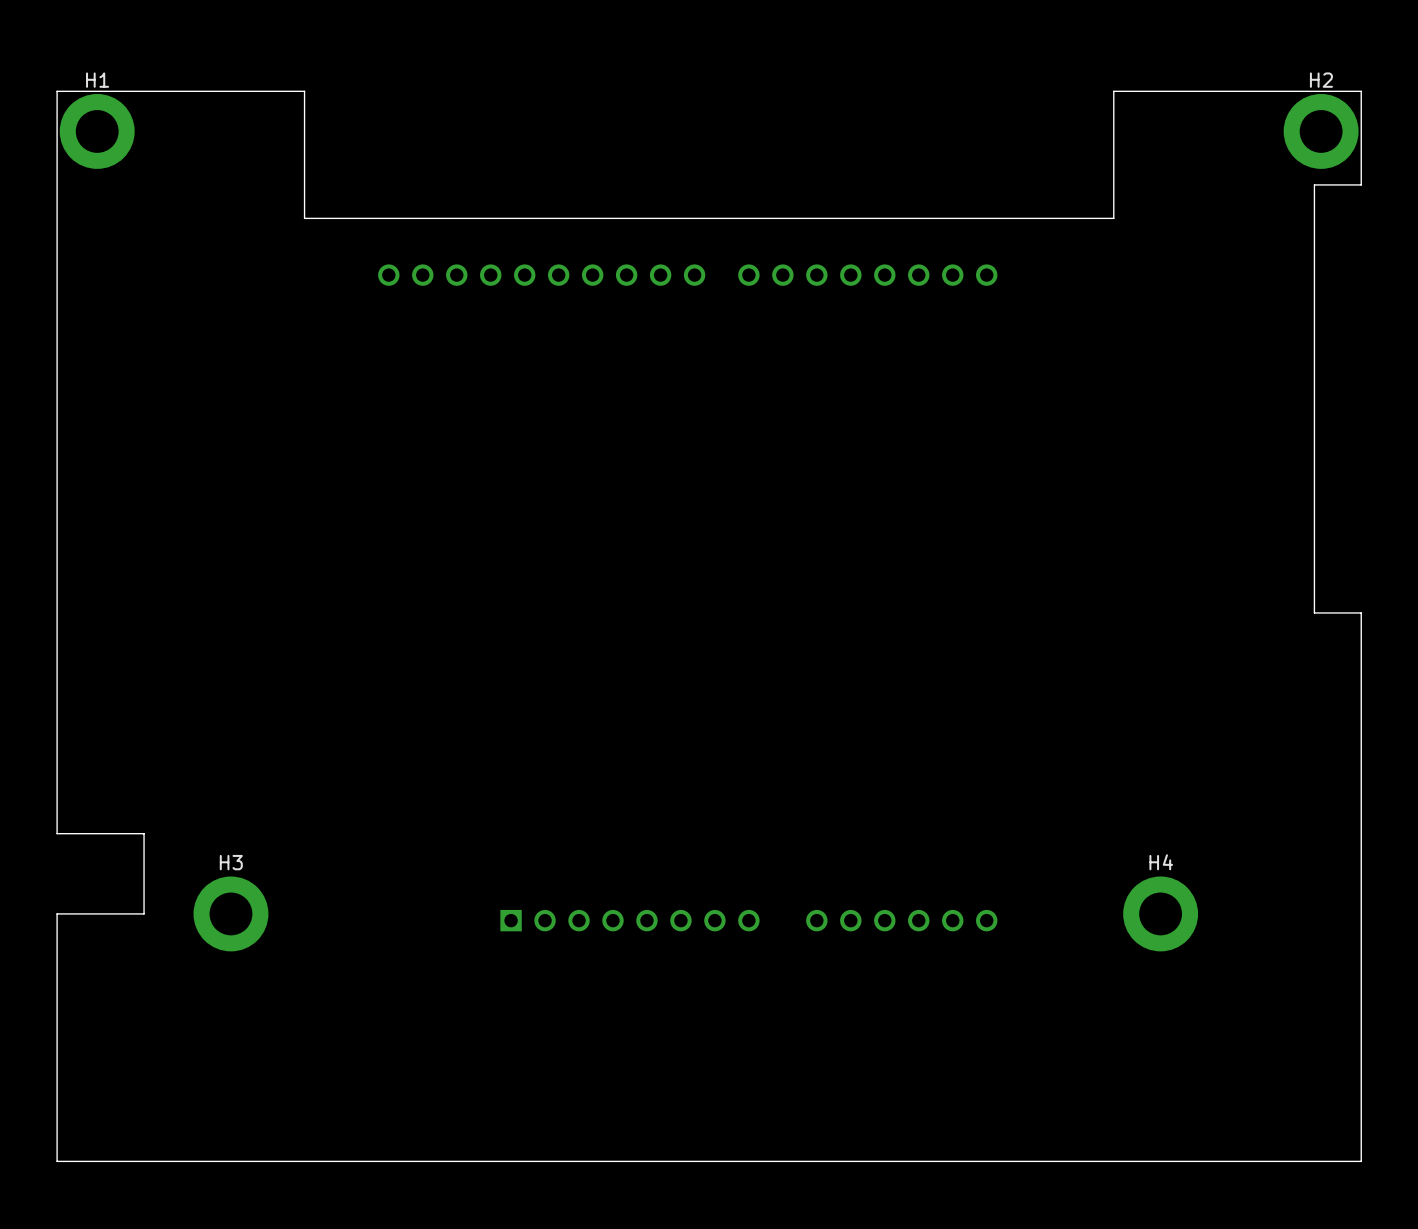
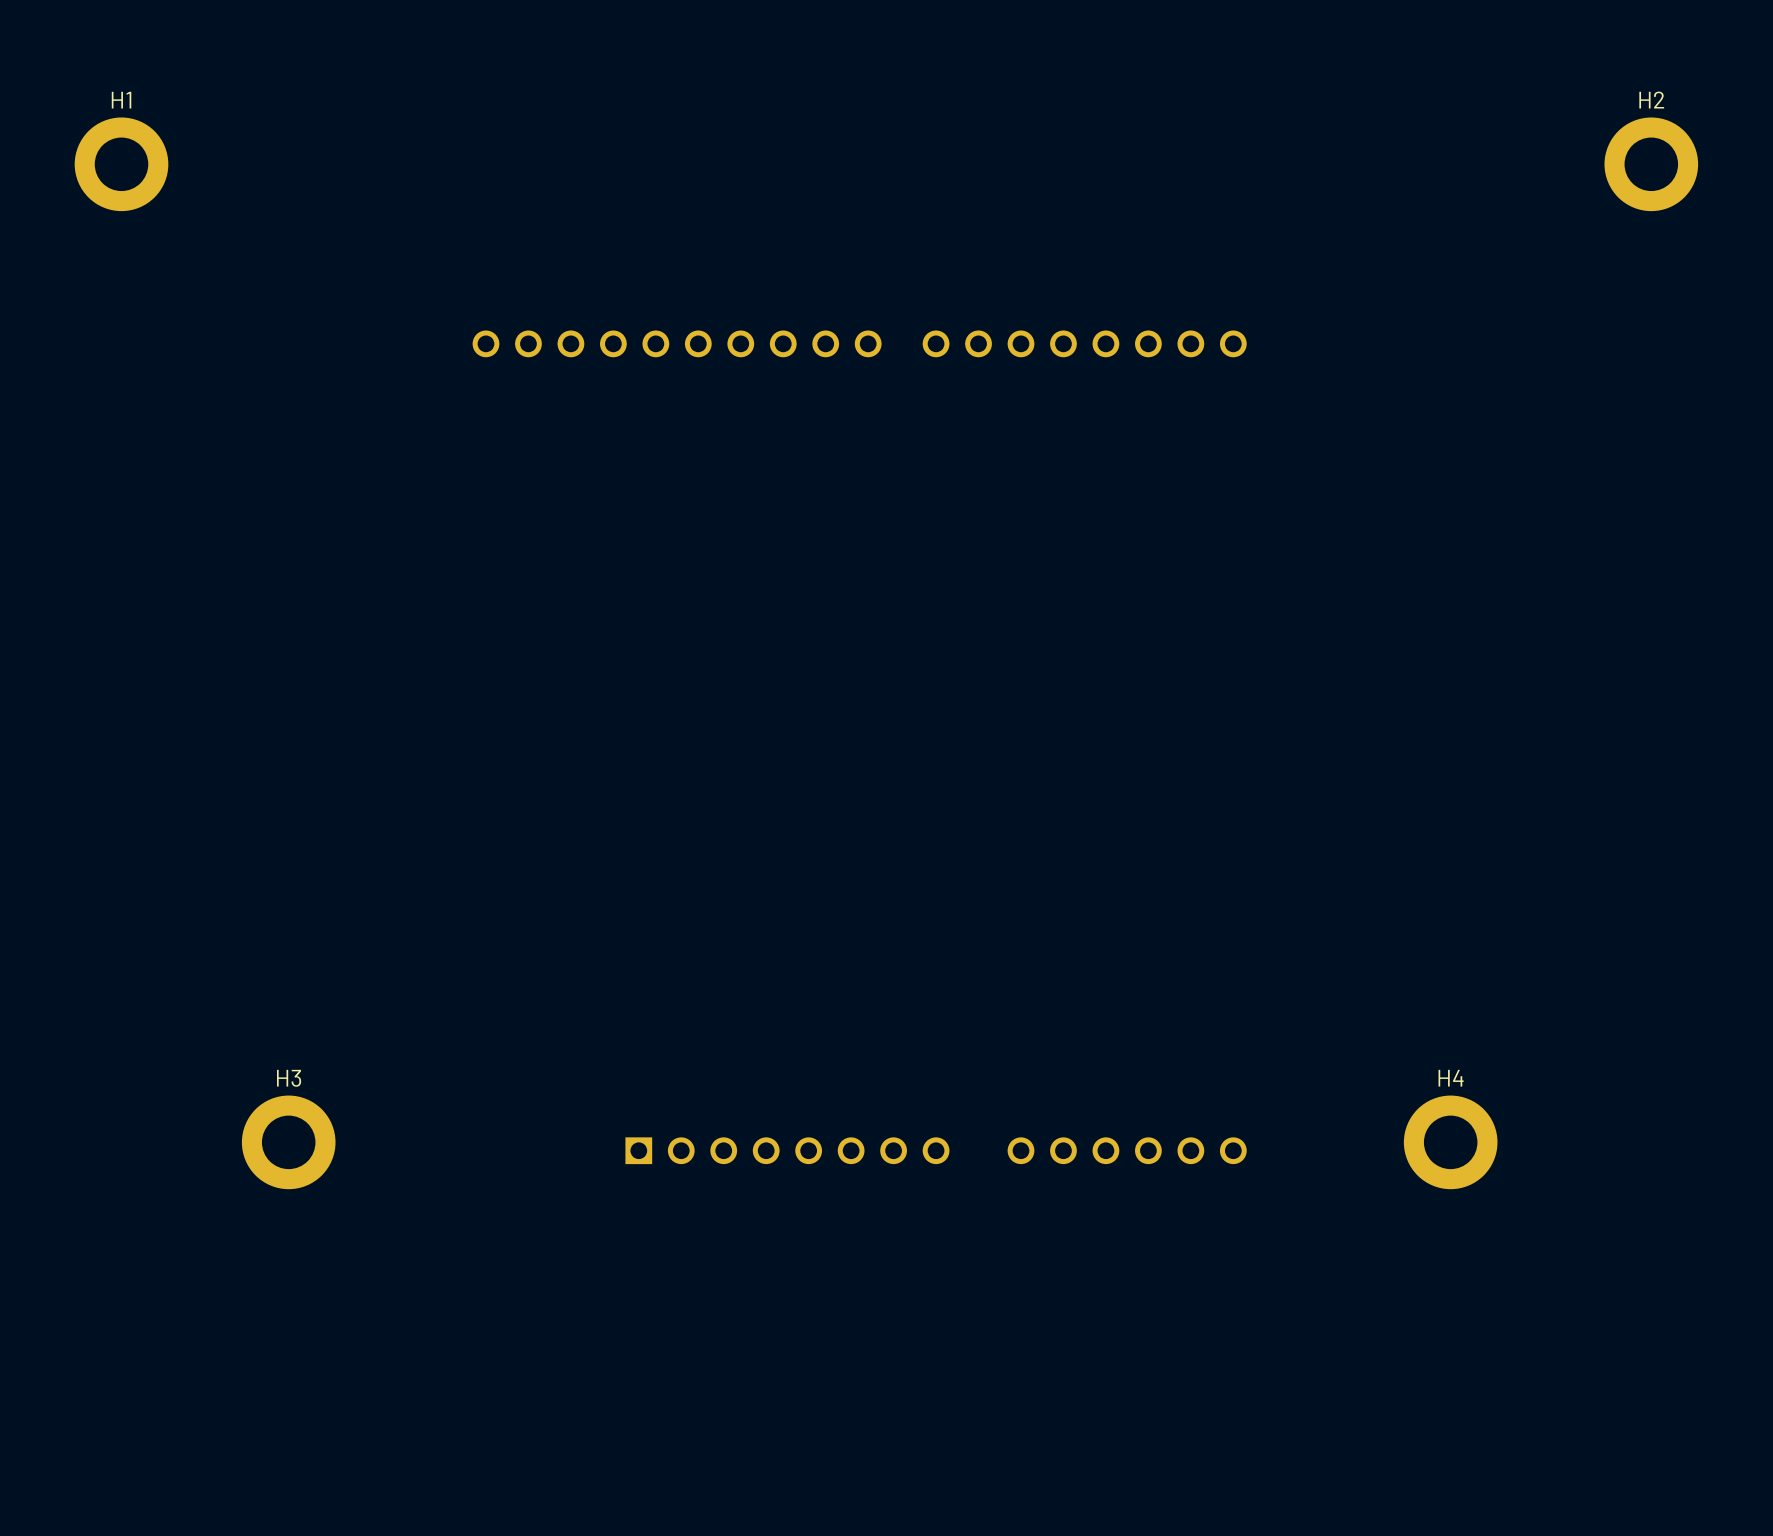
board edge: (57, 91) (57, 833) (144, 833) (144, 913) (57, 913) (57, 1161) (1361, 1161) (1361, 612) (1314, 612) (1314, 184) (1361, 184) (1361, 91) (1113, 91) (1113, 218) (304, 218) (304, 91) (57, 91) -> none

